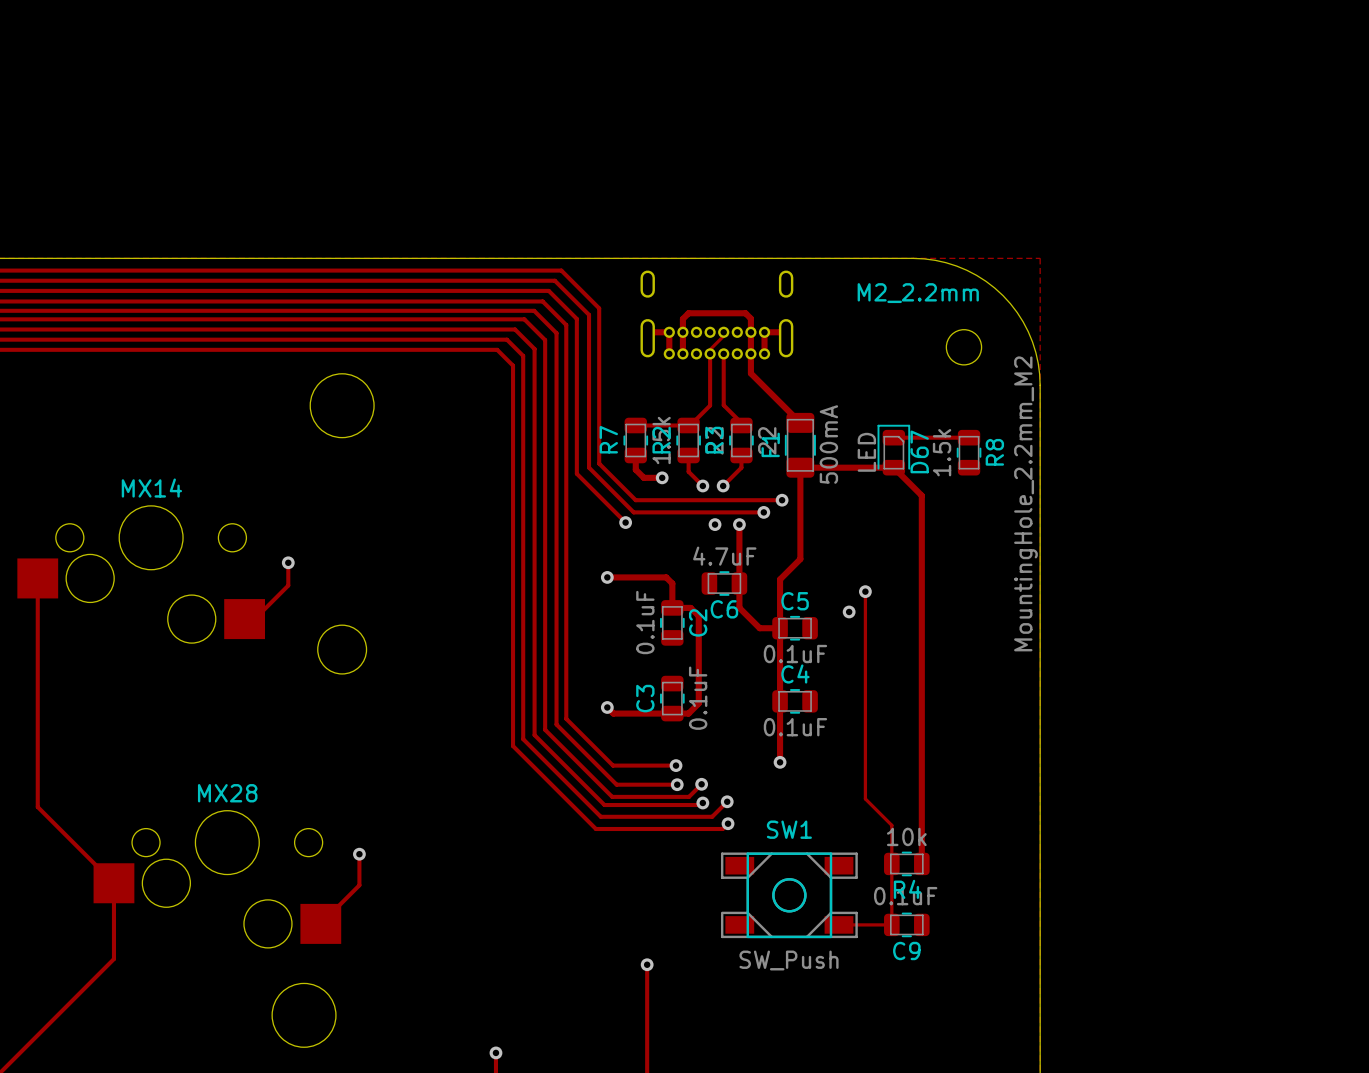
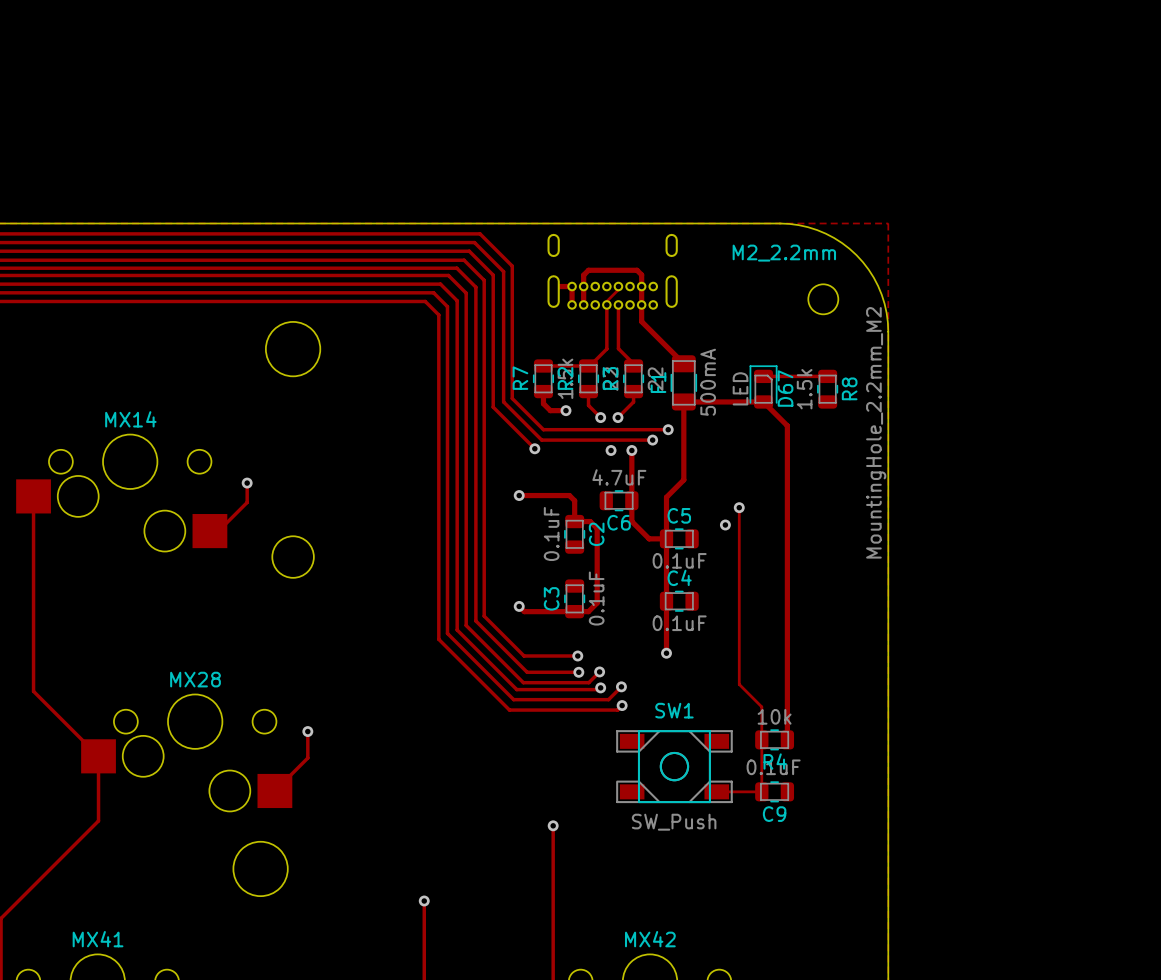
track: (786, 338) (780, 332) (764, 332) (764, 353) -> none

